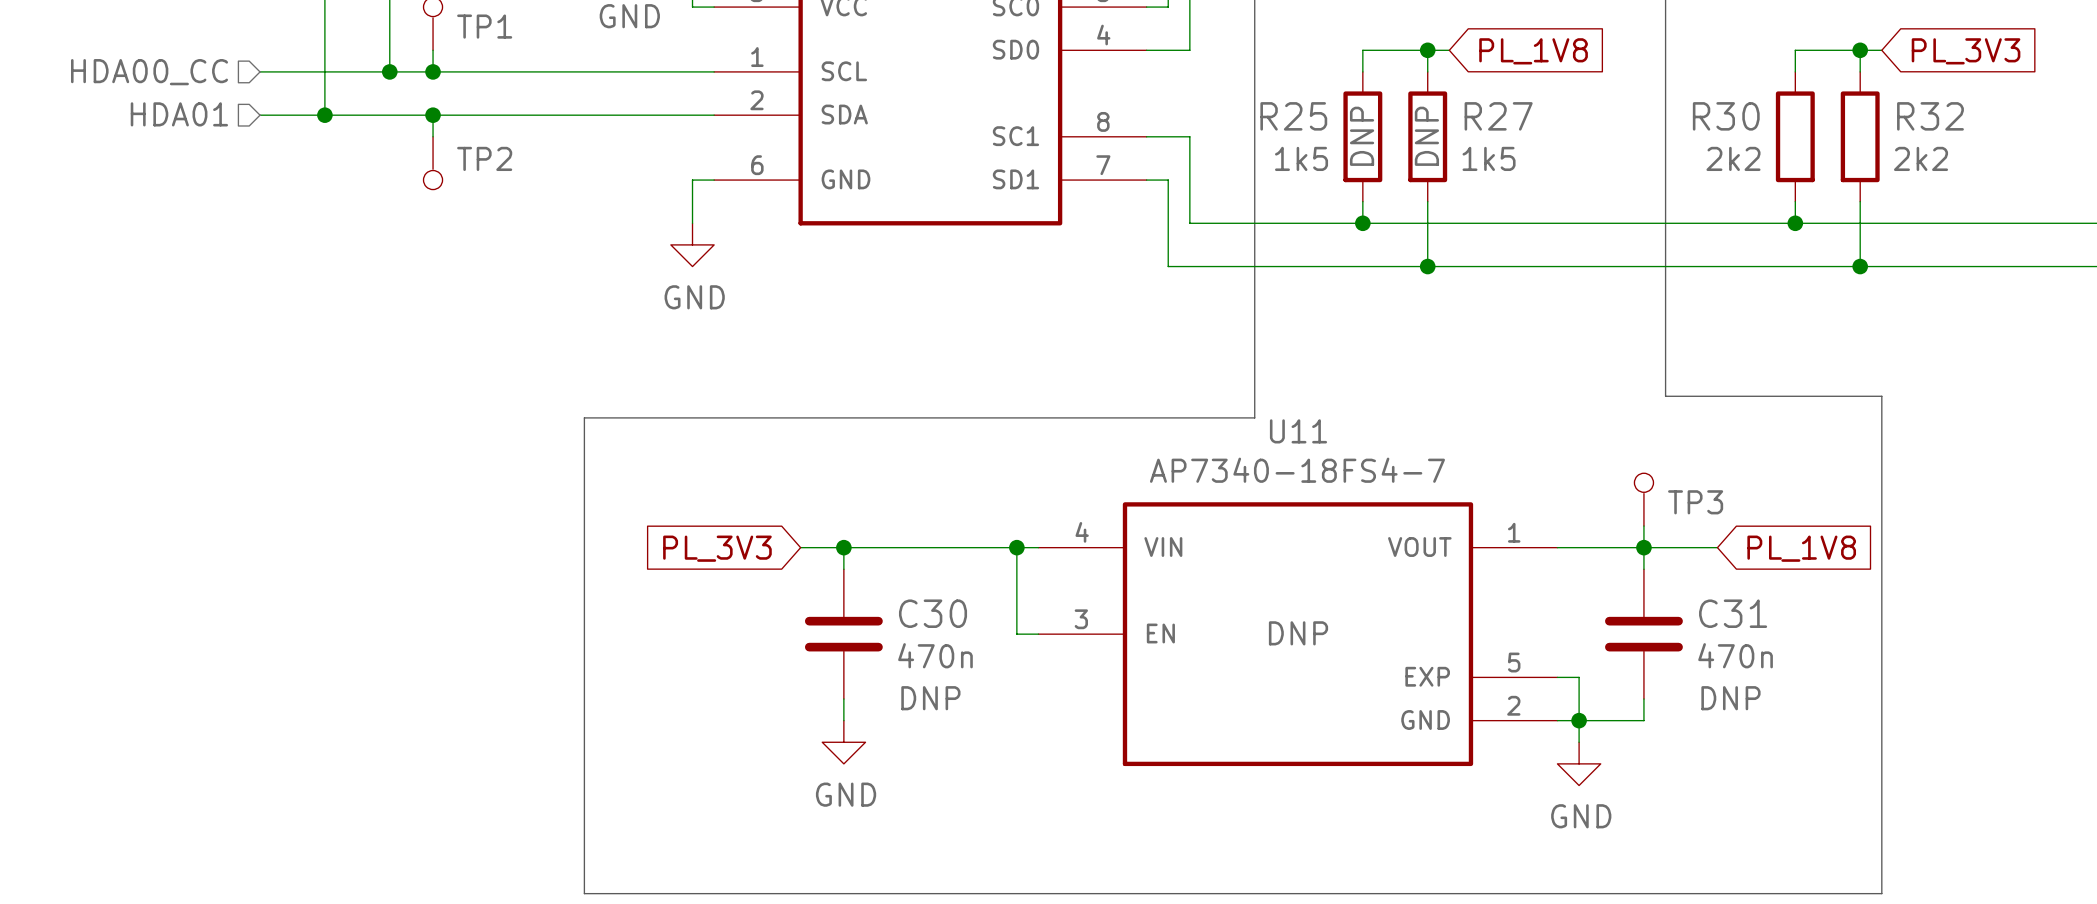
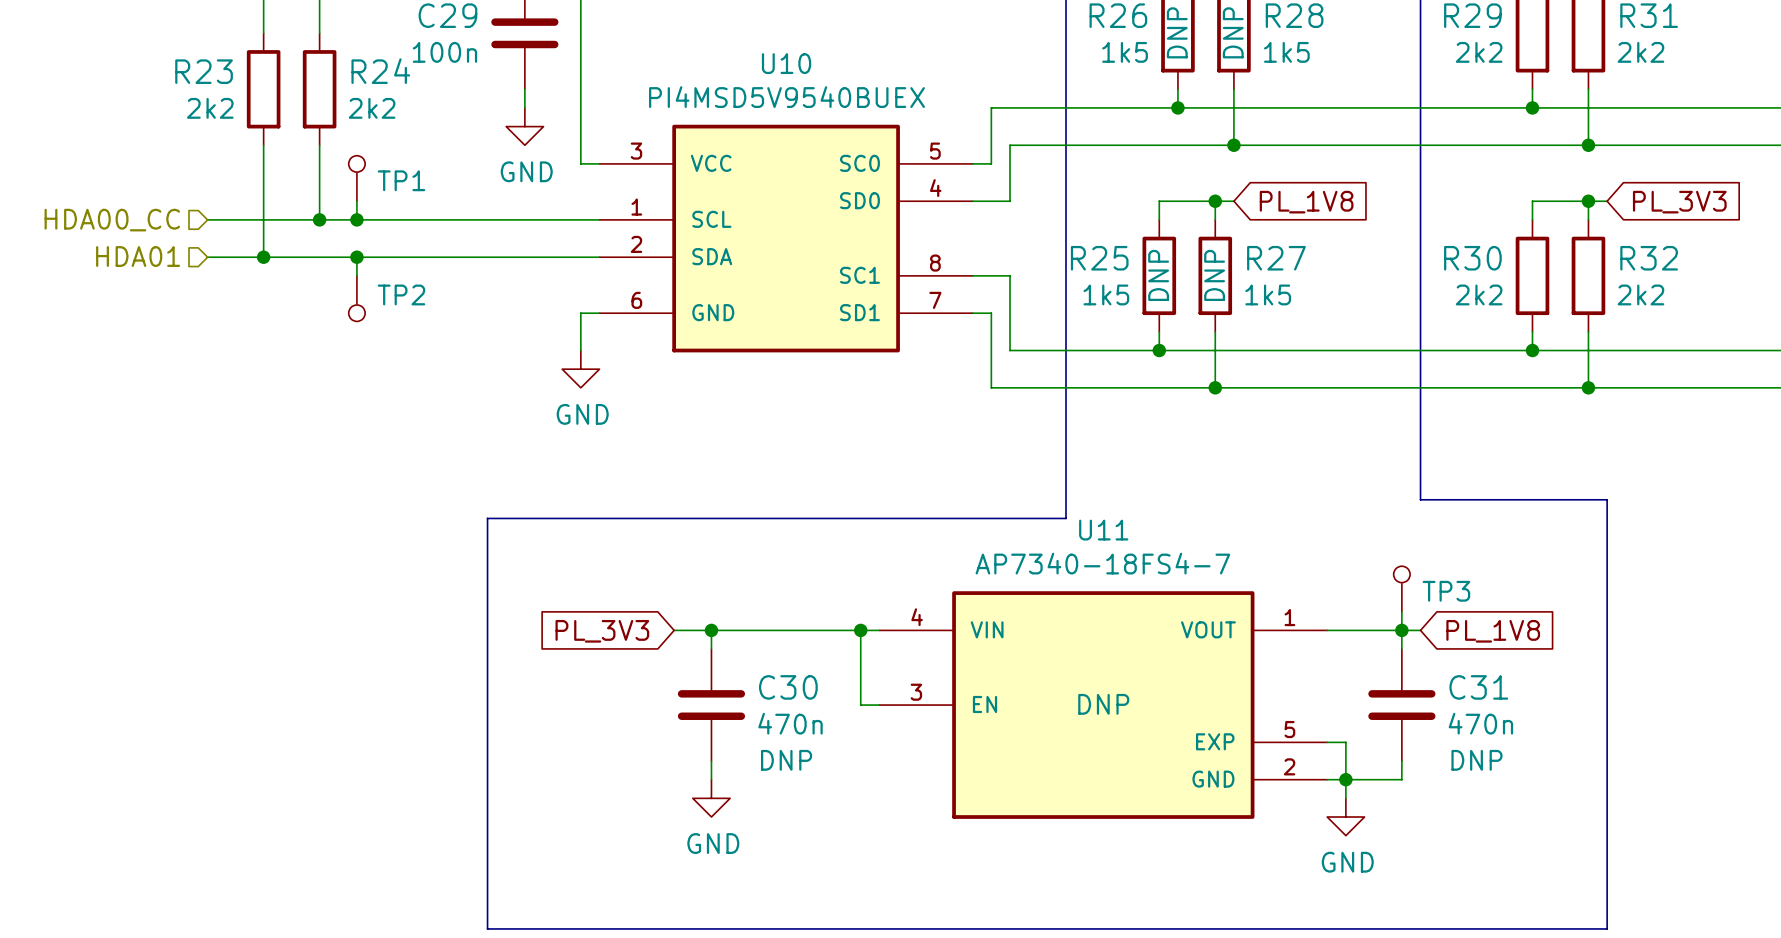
wire: (1665, 547) (1717, 547) -> none
global label position: PL_1V8 (1801, 548) -> PL_1V8 (1493, 631)

